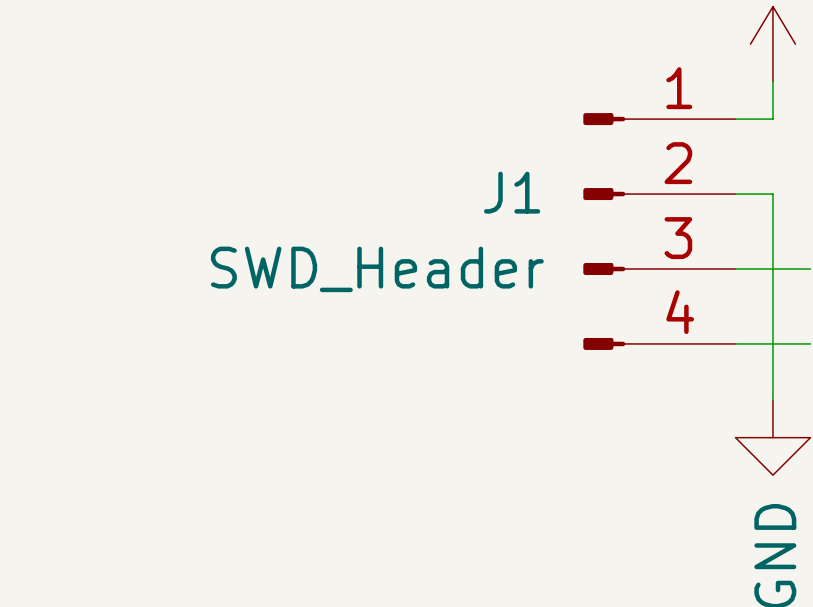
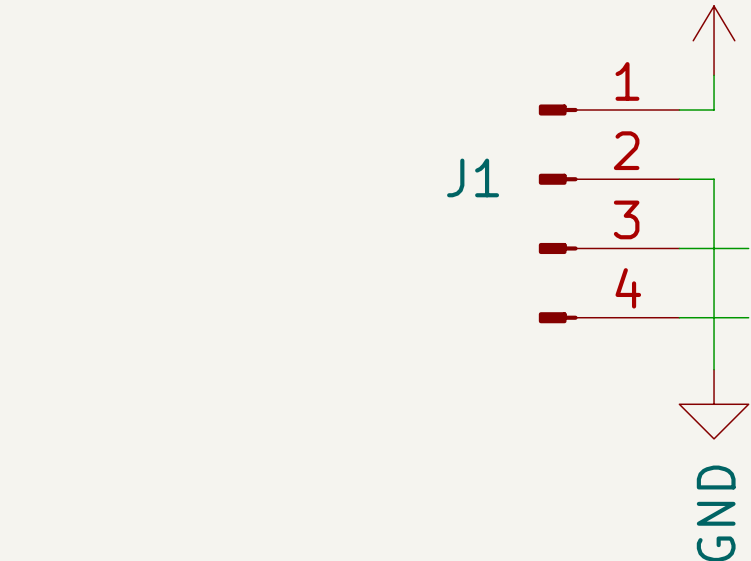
J1 value: SWD_Header (377, 269) -> none

